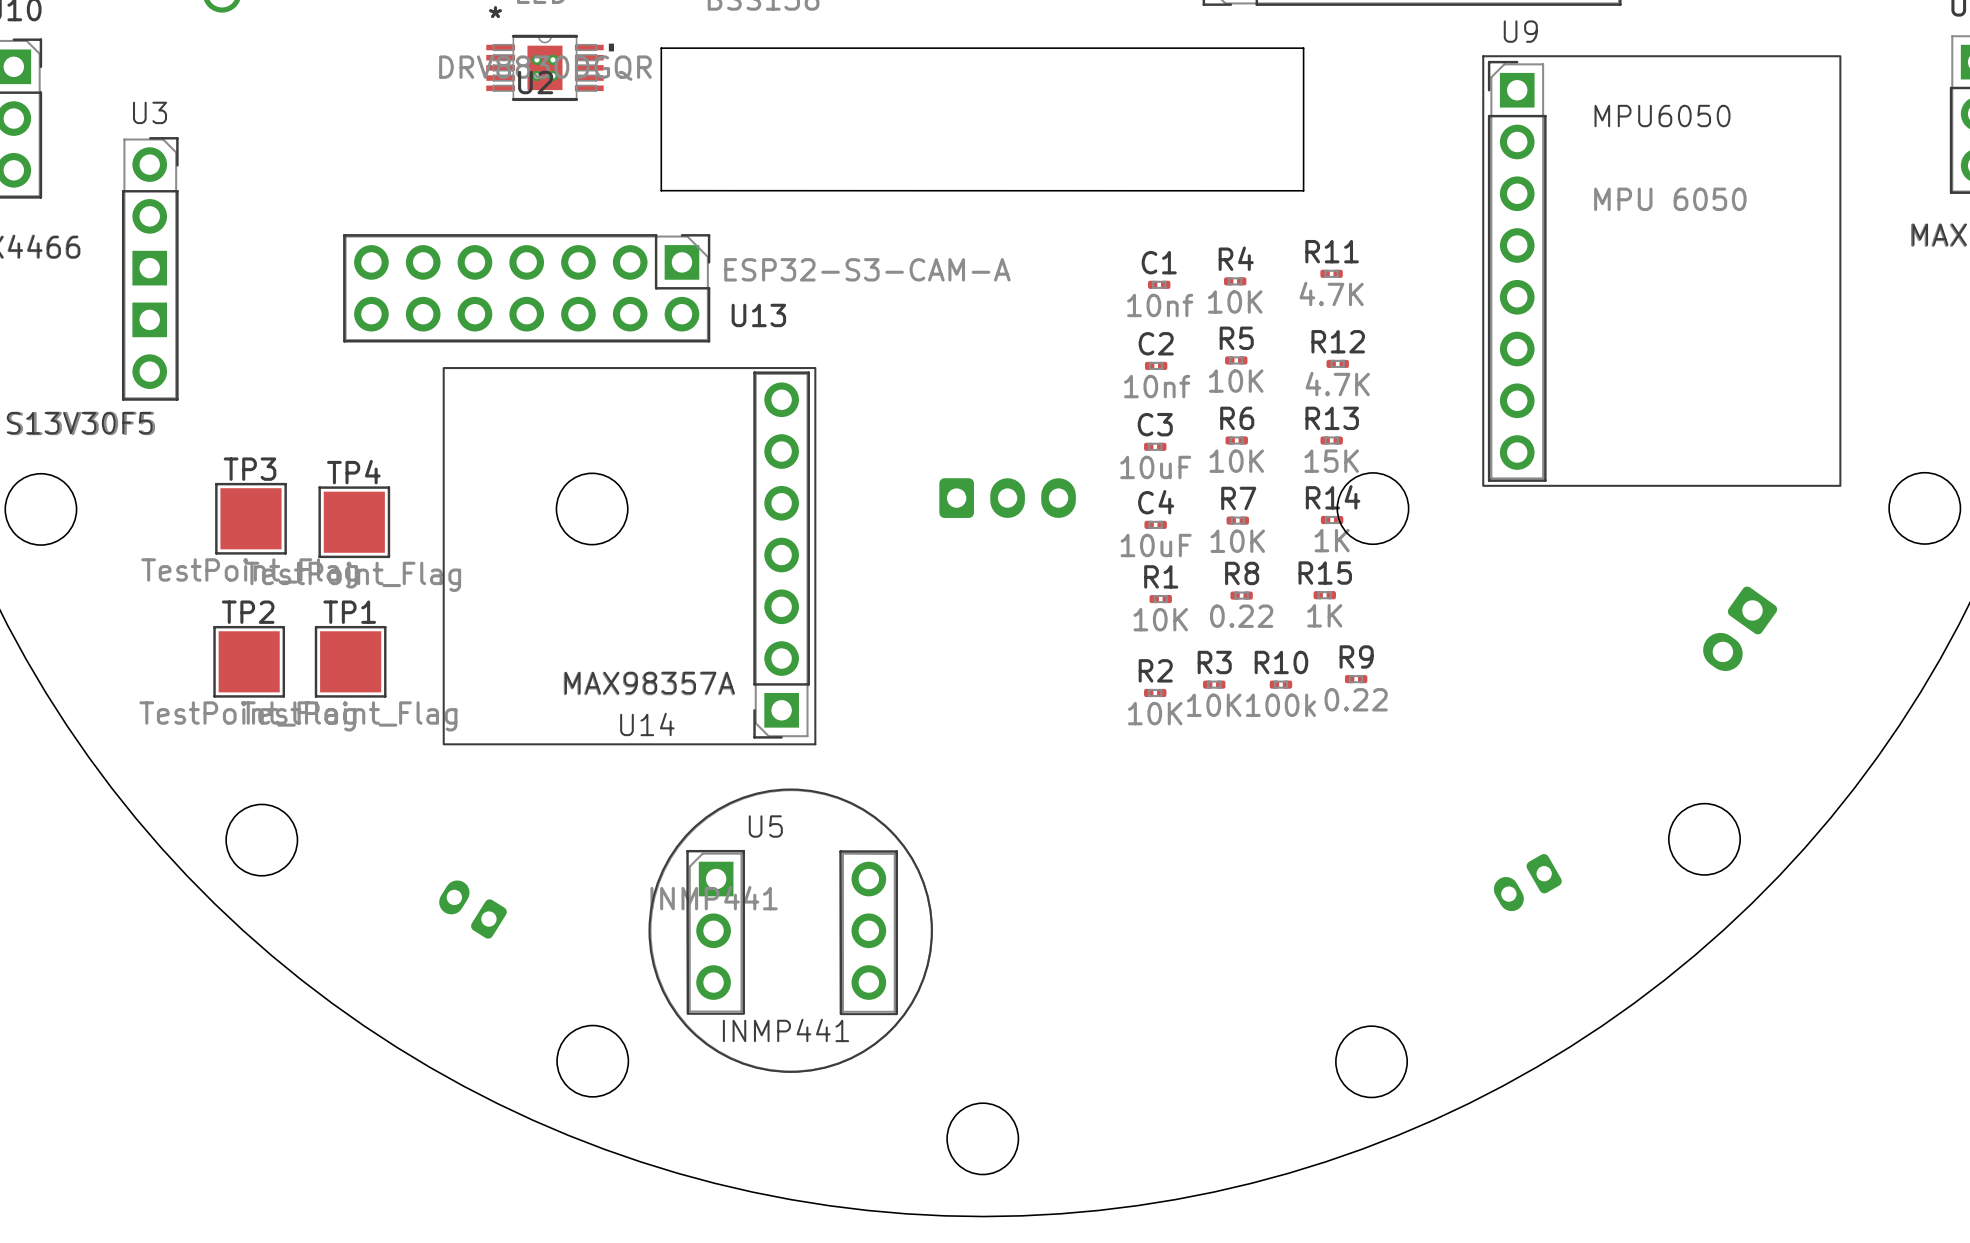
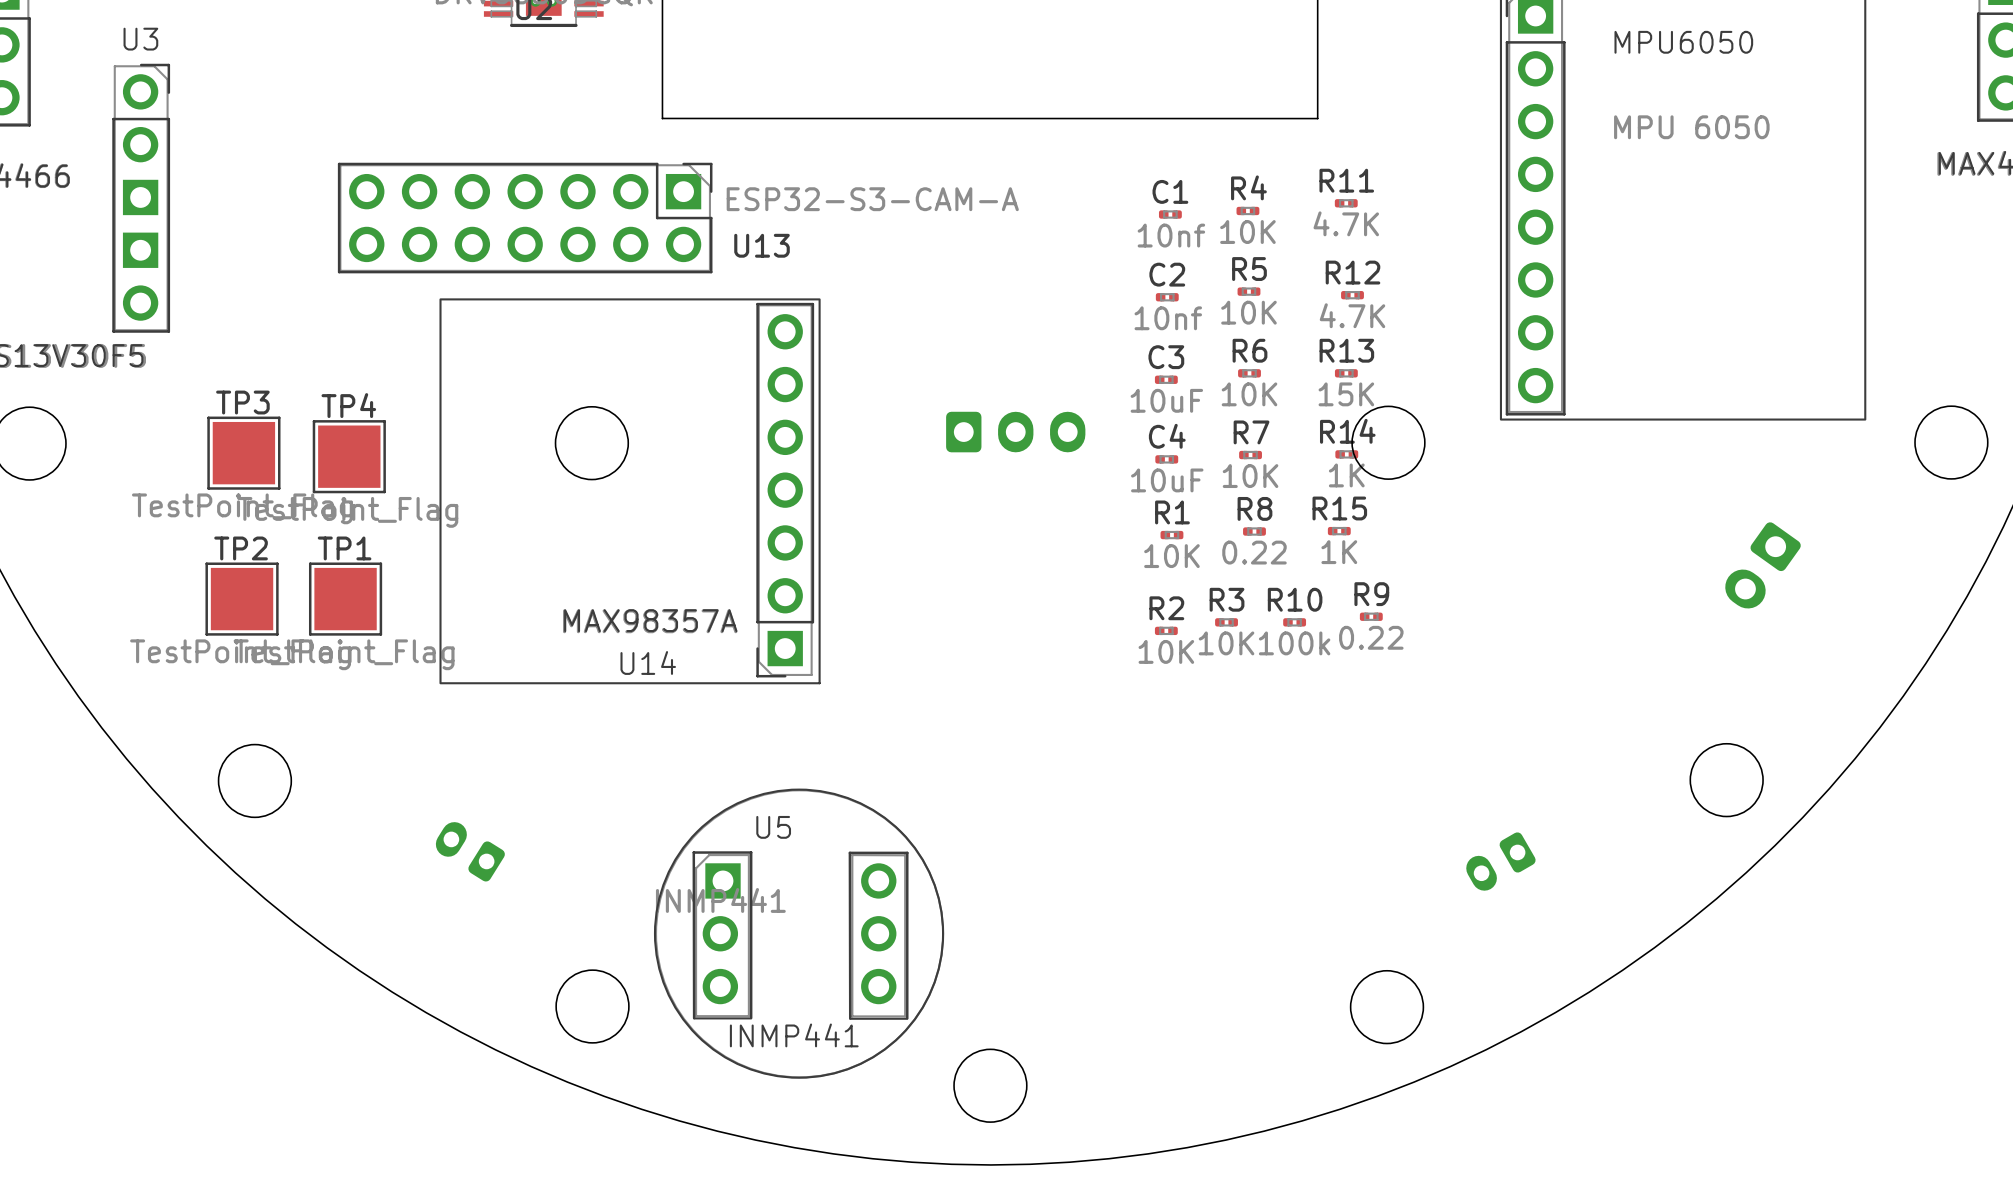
part position: (1527, 882) -> (1500, 861)
U5 position: (790, 930) -> (799, 933)

